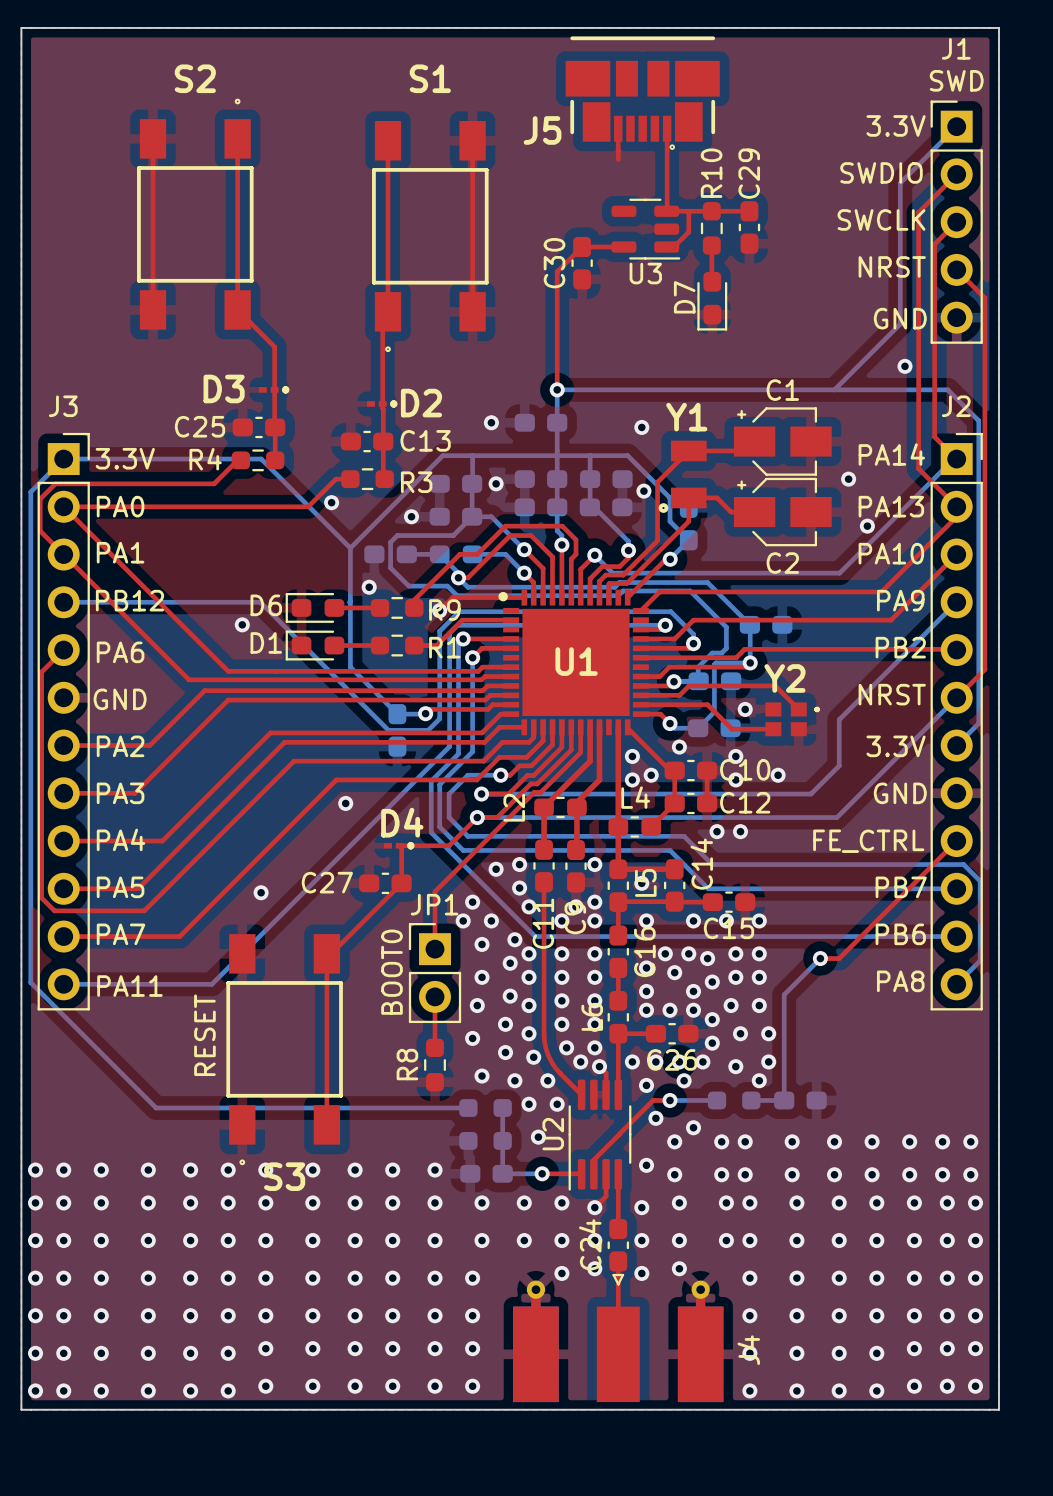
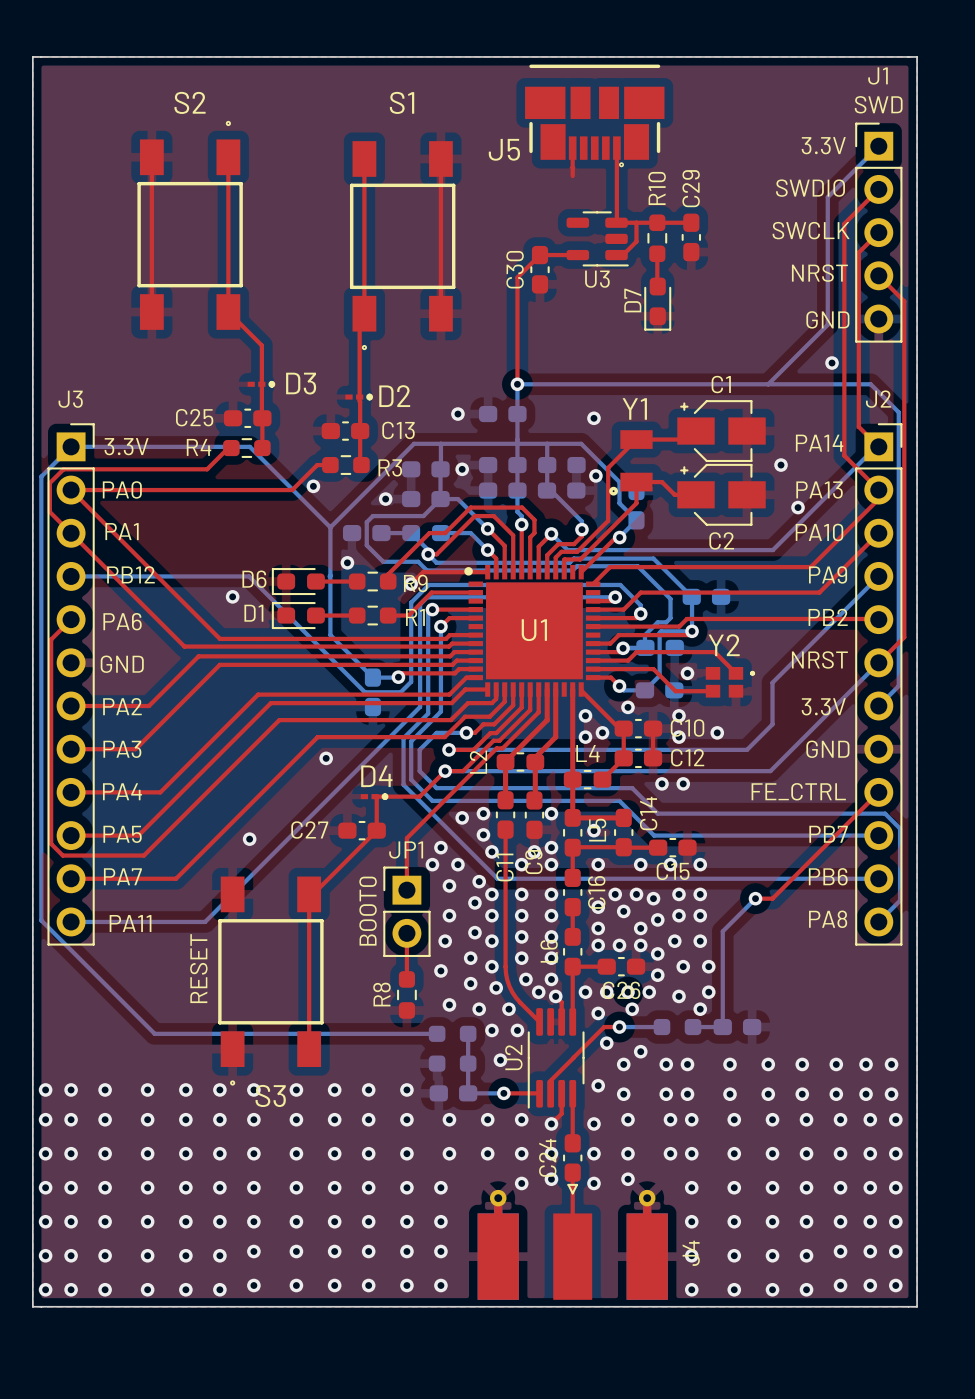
D3 name position: D3 (224, 388) -> D3 (301, 383)

